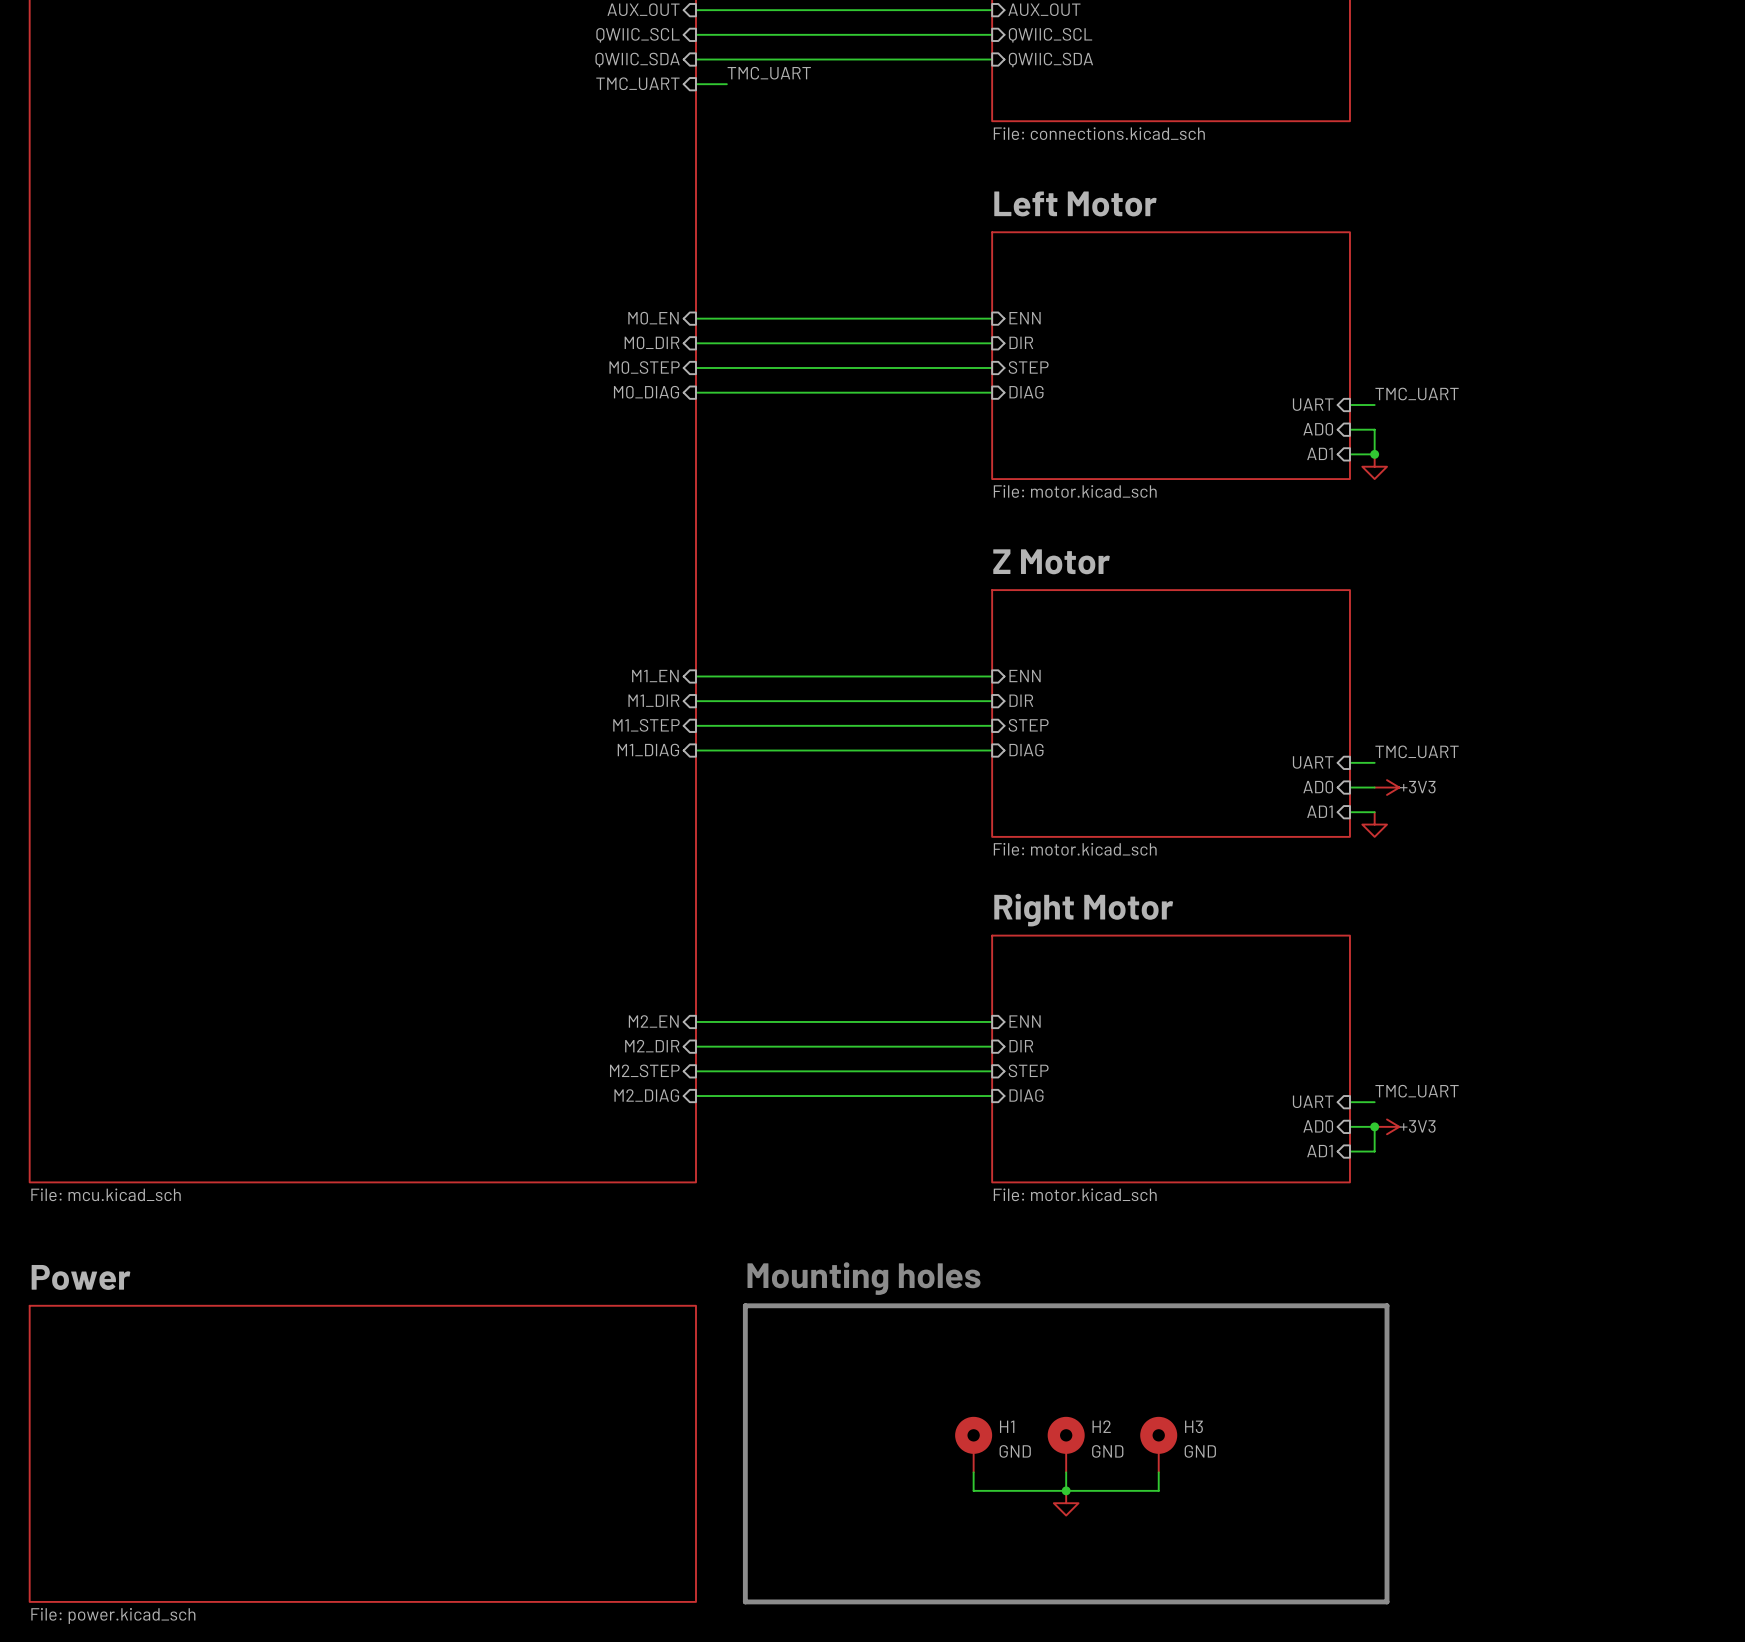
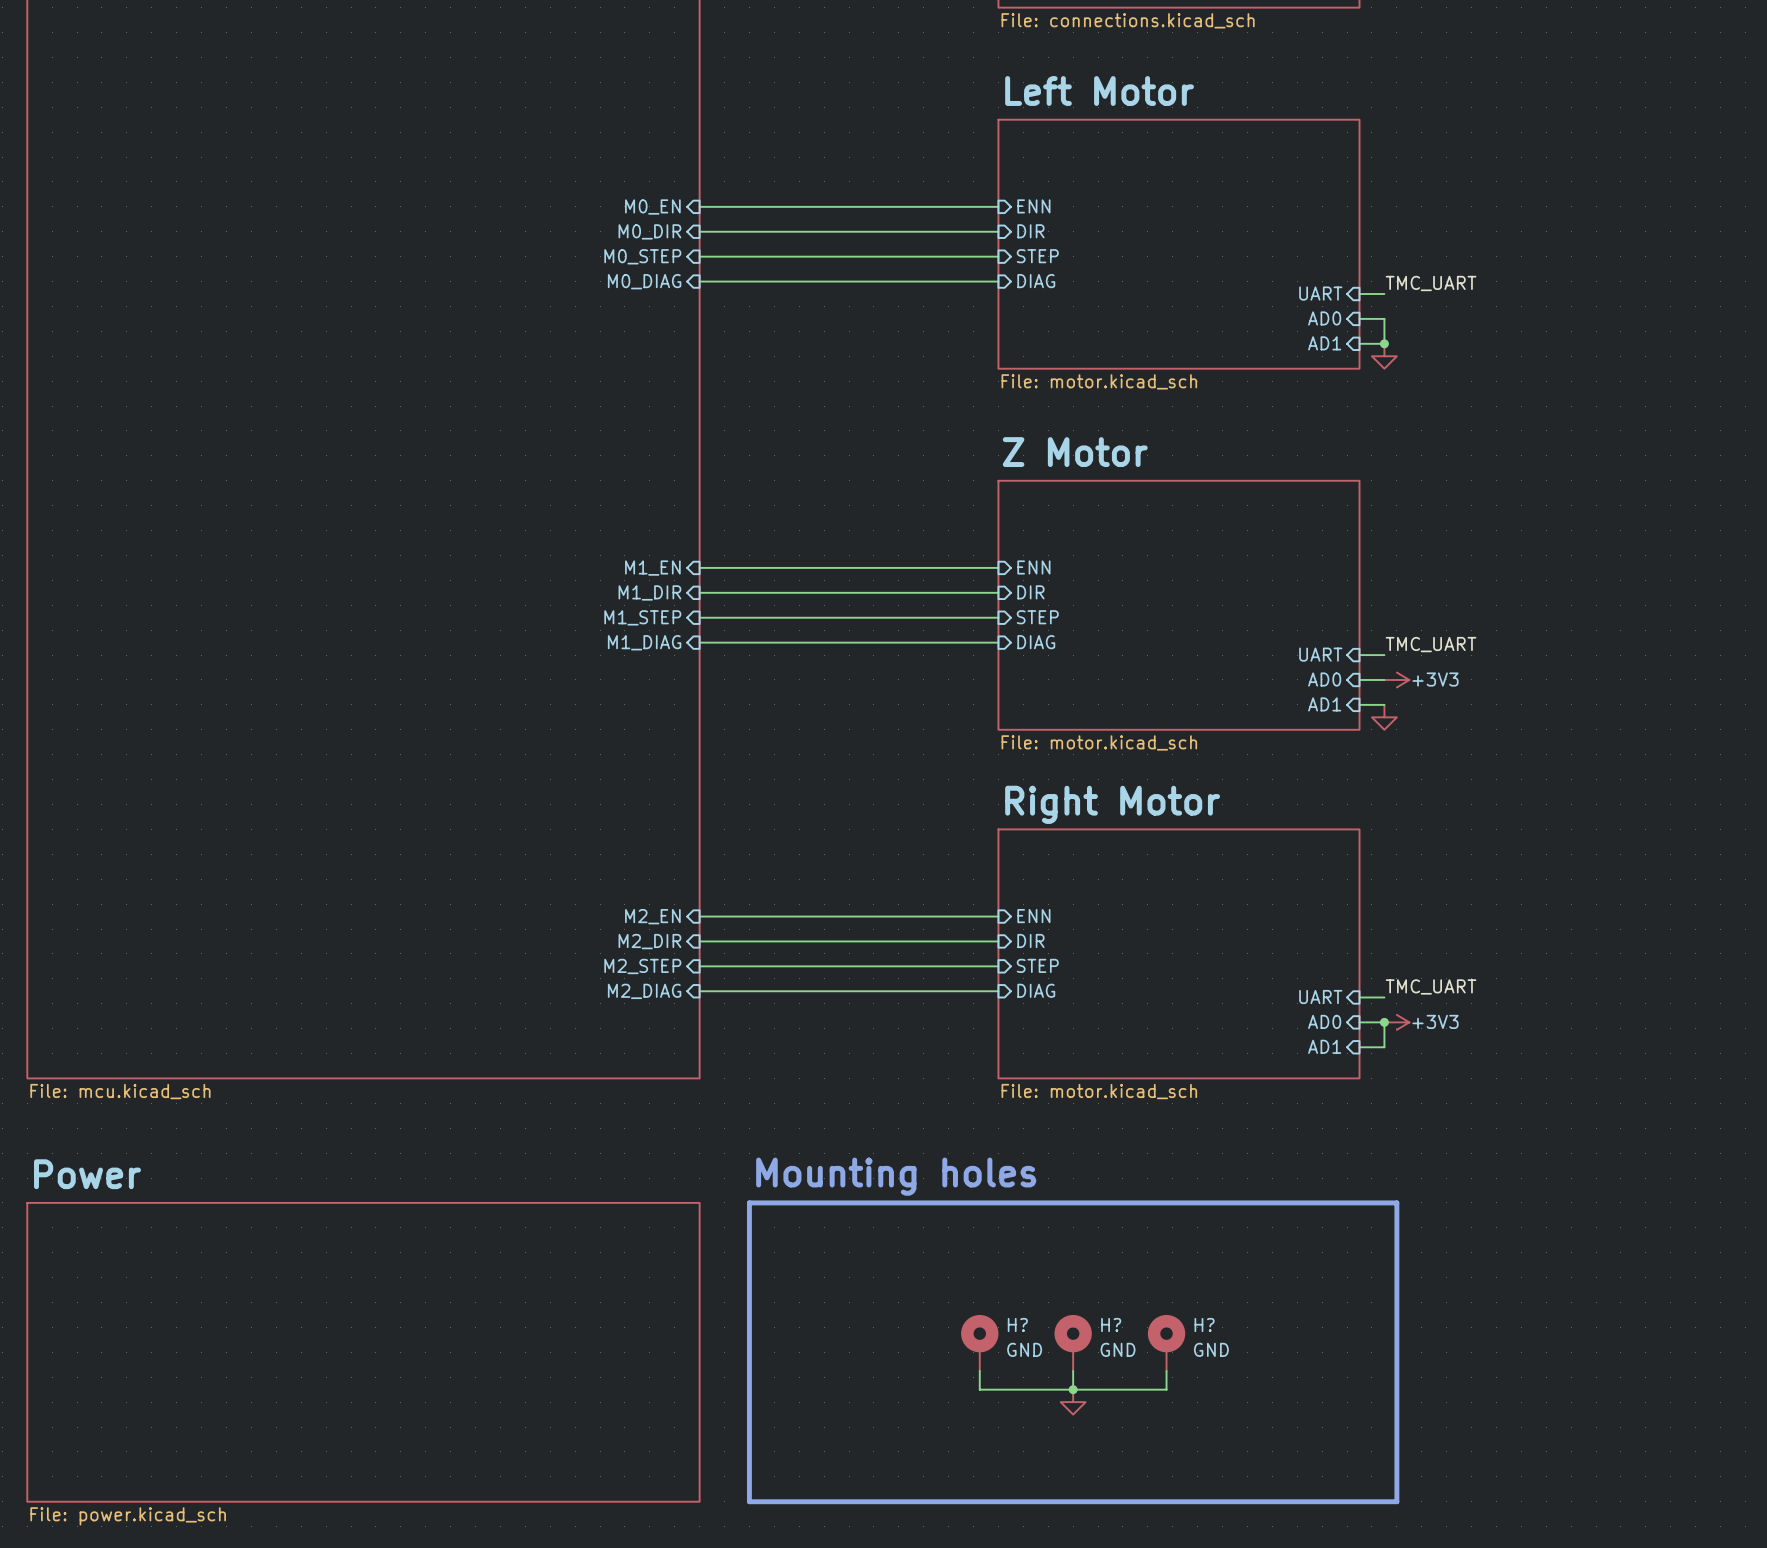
H1 name: H1 (1007, 1426) -> H? (1017, 1325)
H2 name: H2 (1101, 1426) -> H? (1111, 1325)
H3 name: H3 (1193, 1426) -> H? (1204, 1325)

